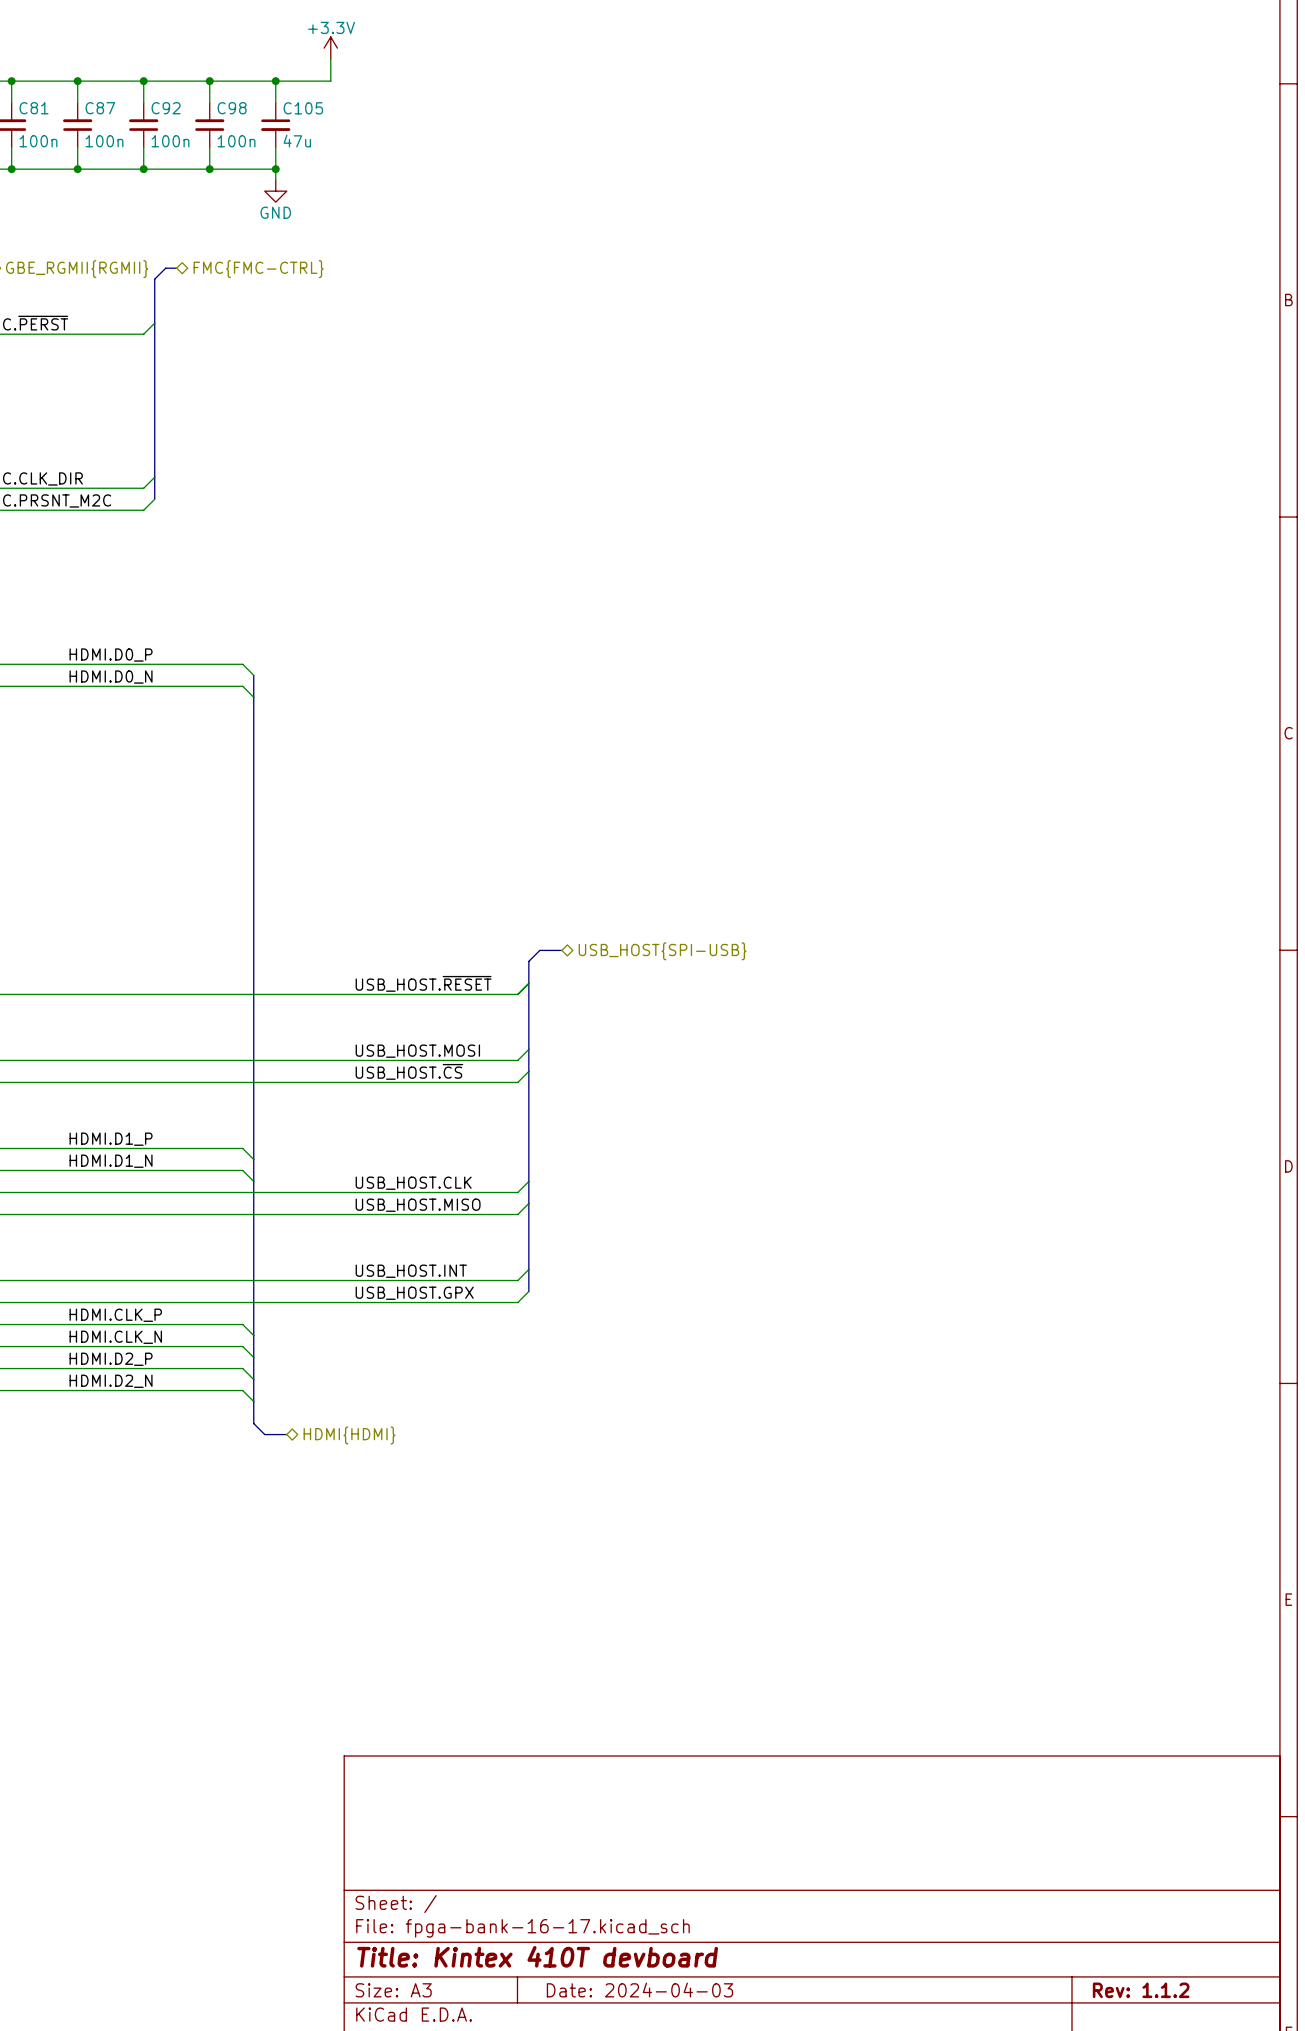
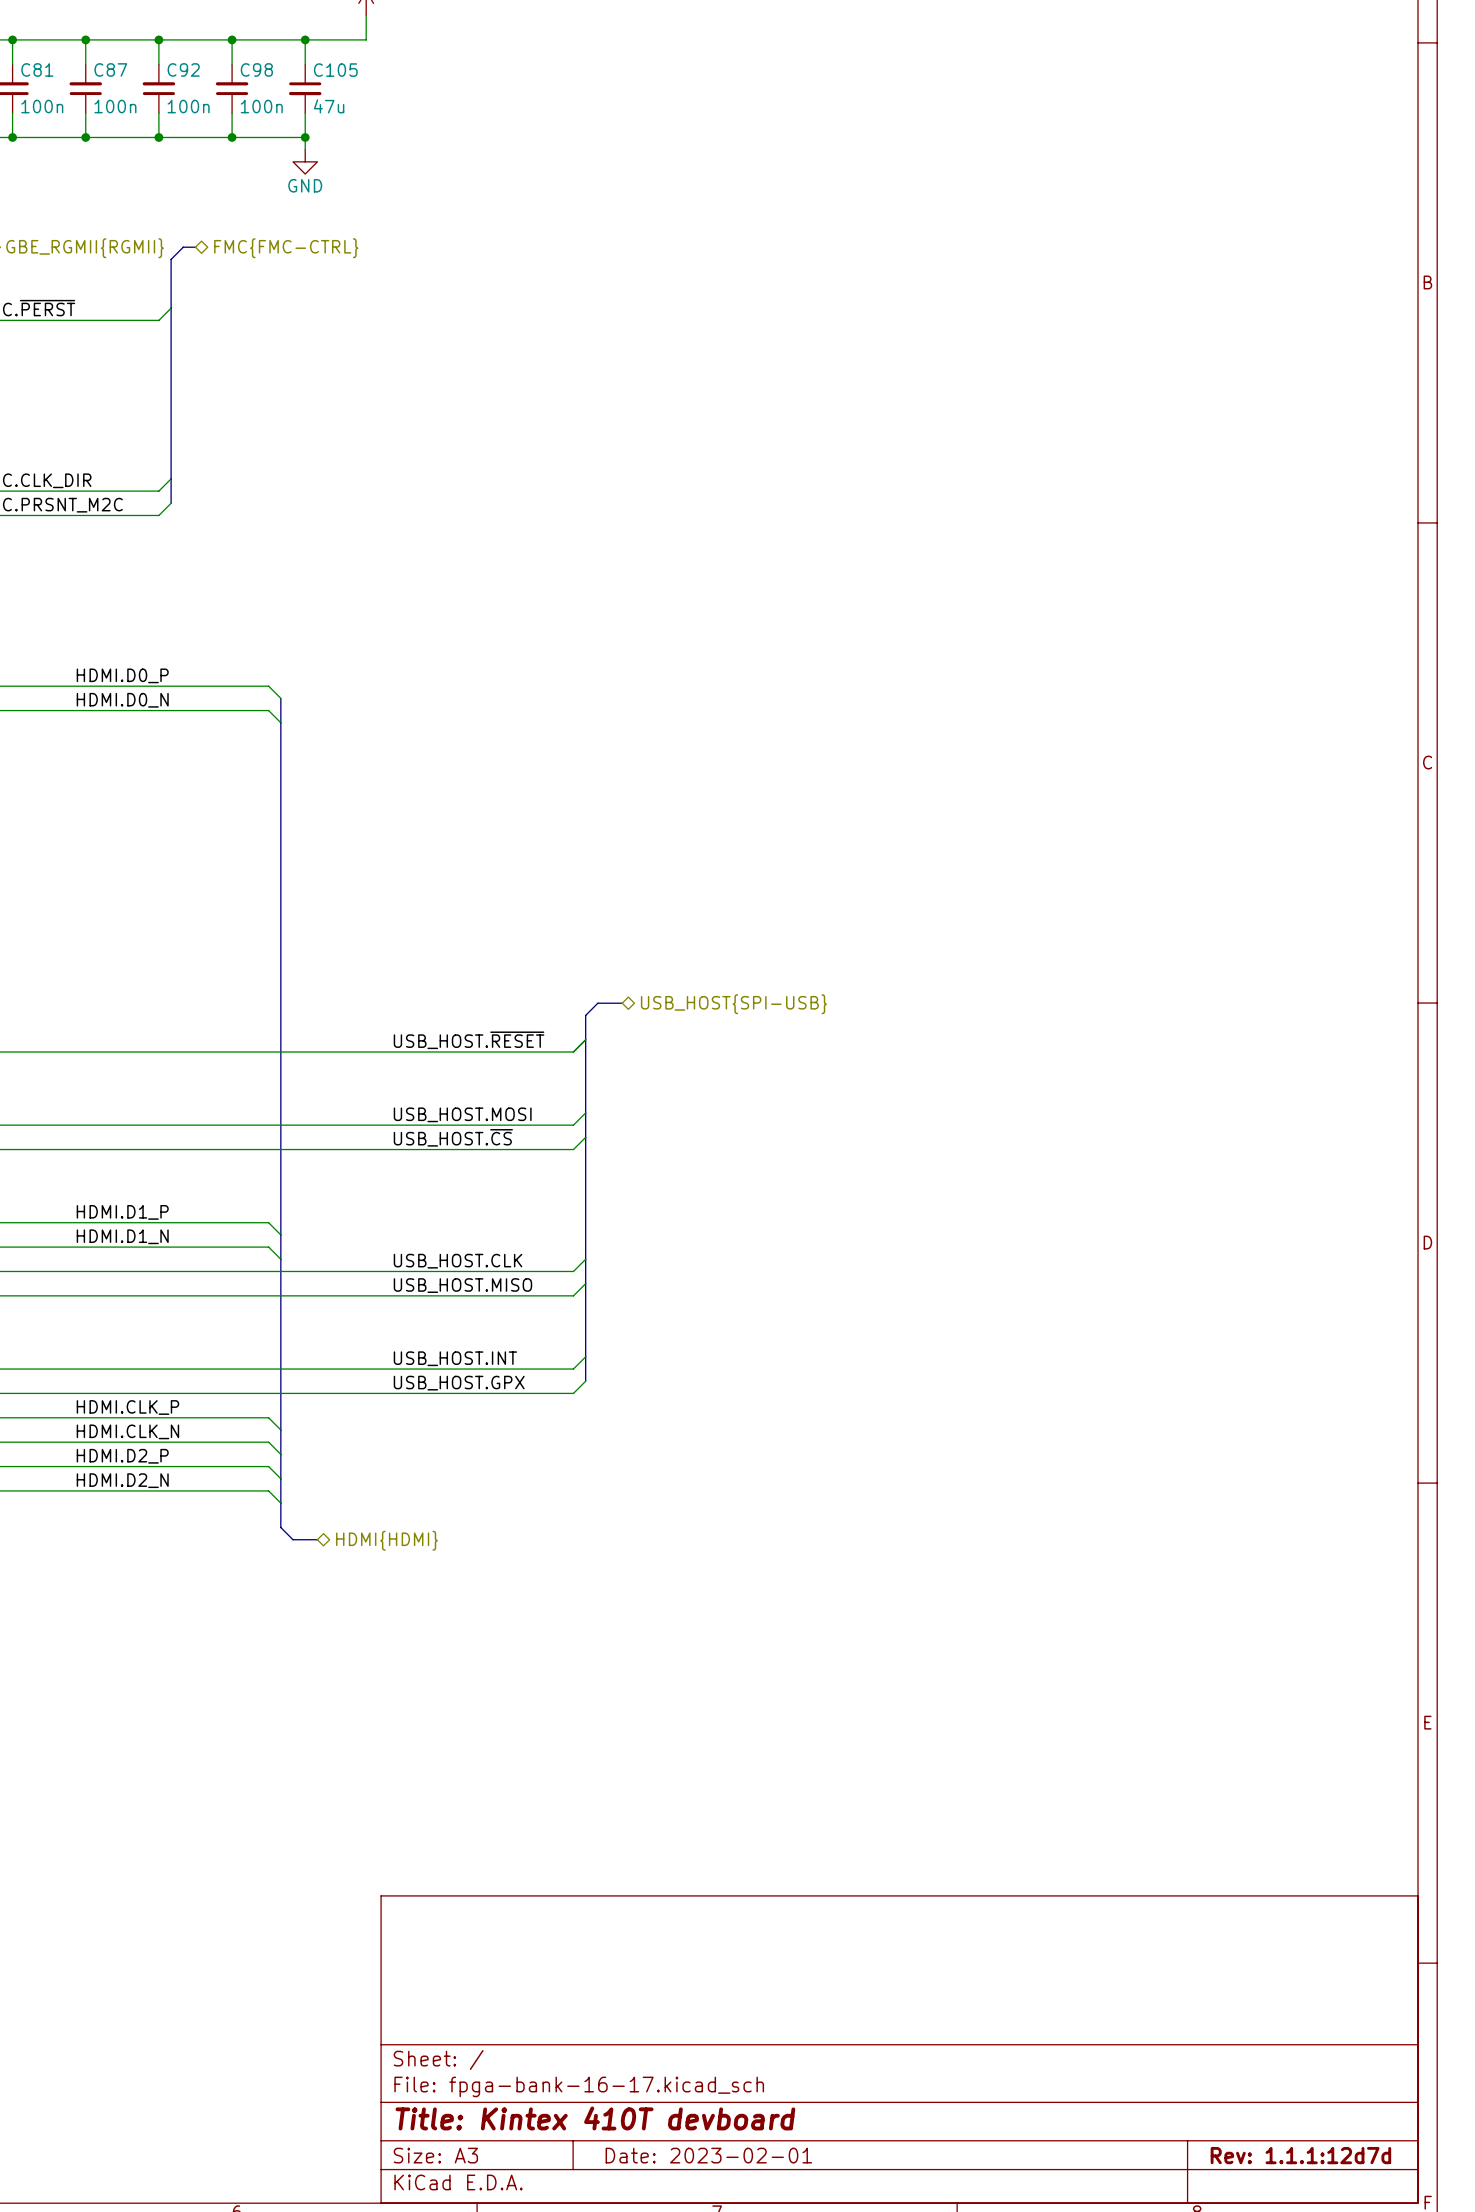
title block: Date: 2024-04-03 (639, 1990) -> Date: 2023-02-01 (708, 2155)
title block: Rev: 1.1.2 (1141, 1990) -> Rev: 1.1.1:12d7d (1300, 2155)

